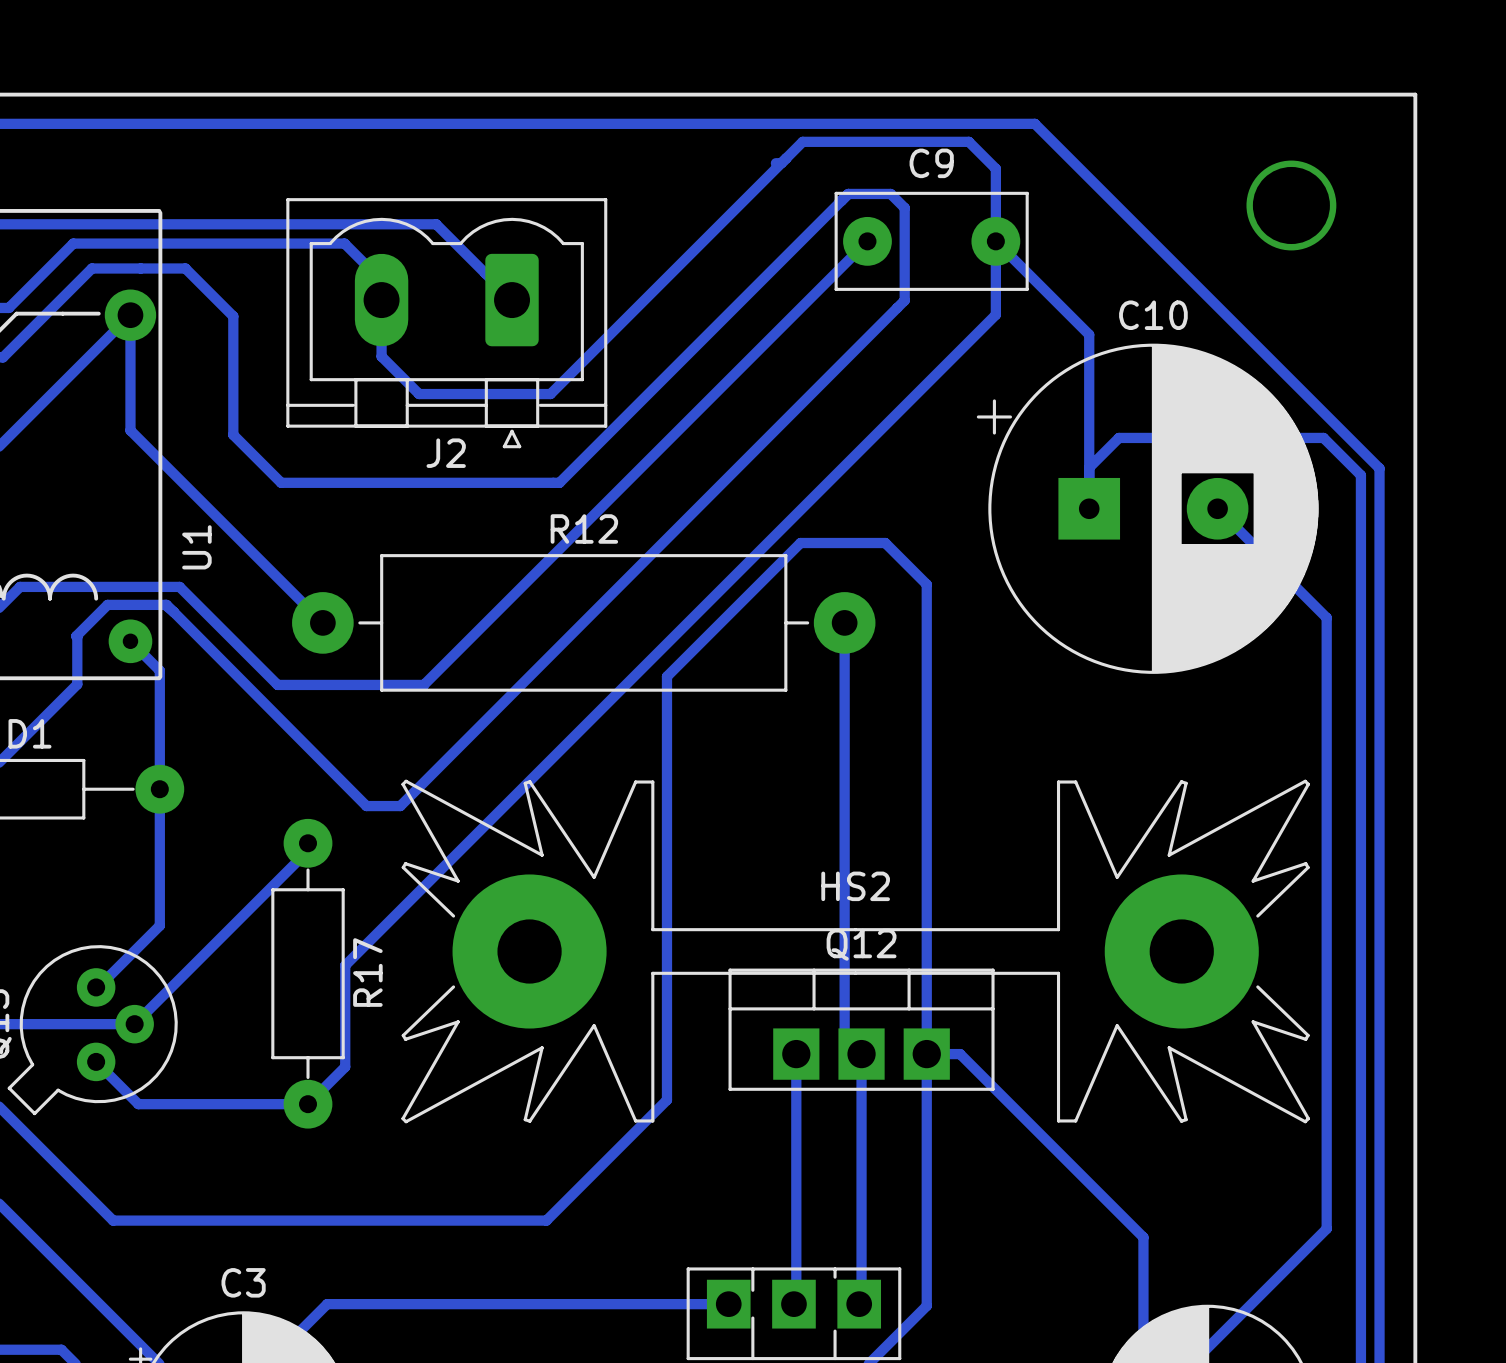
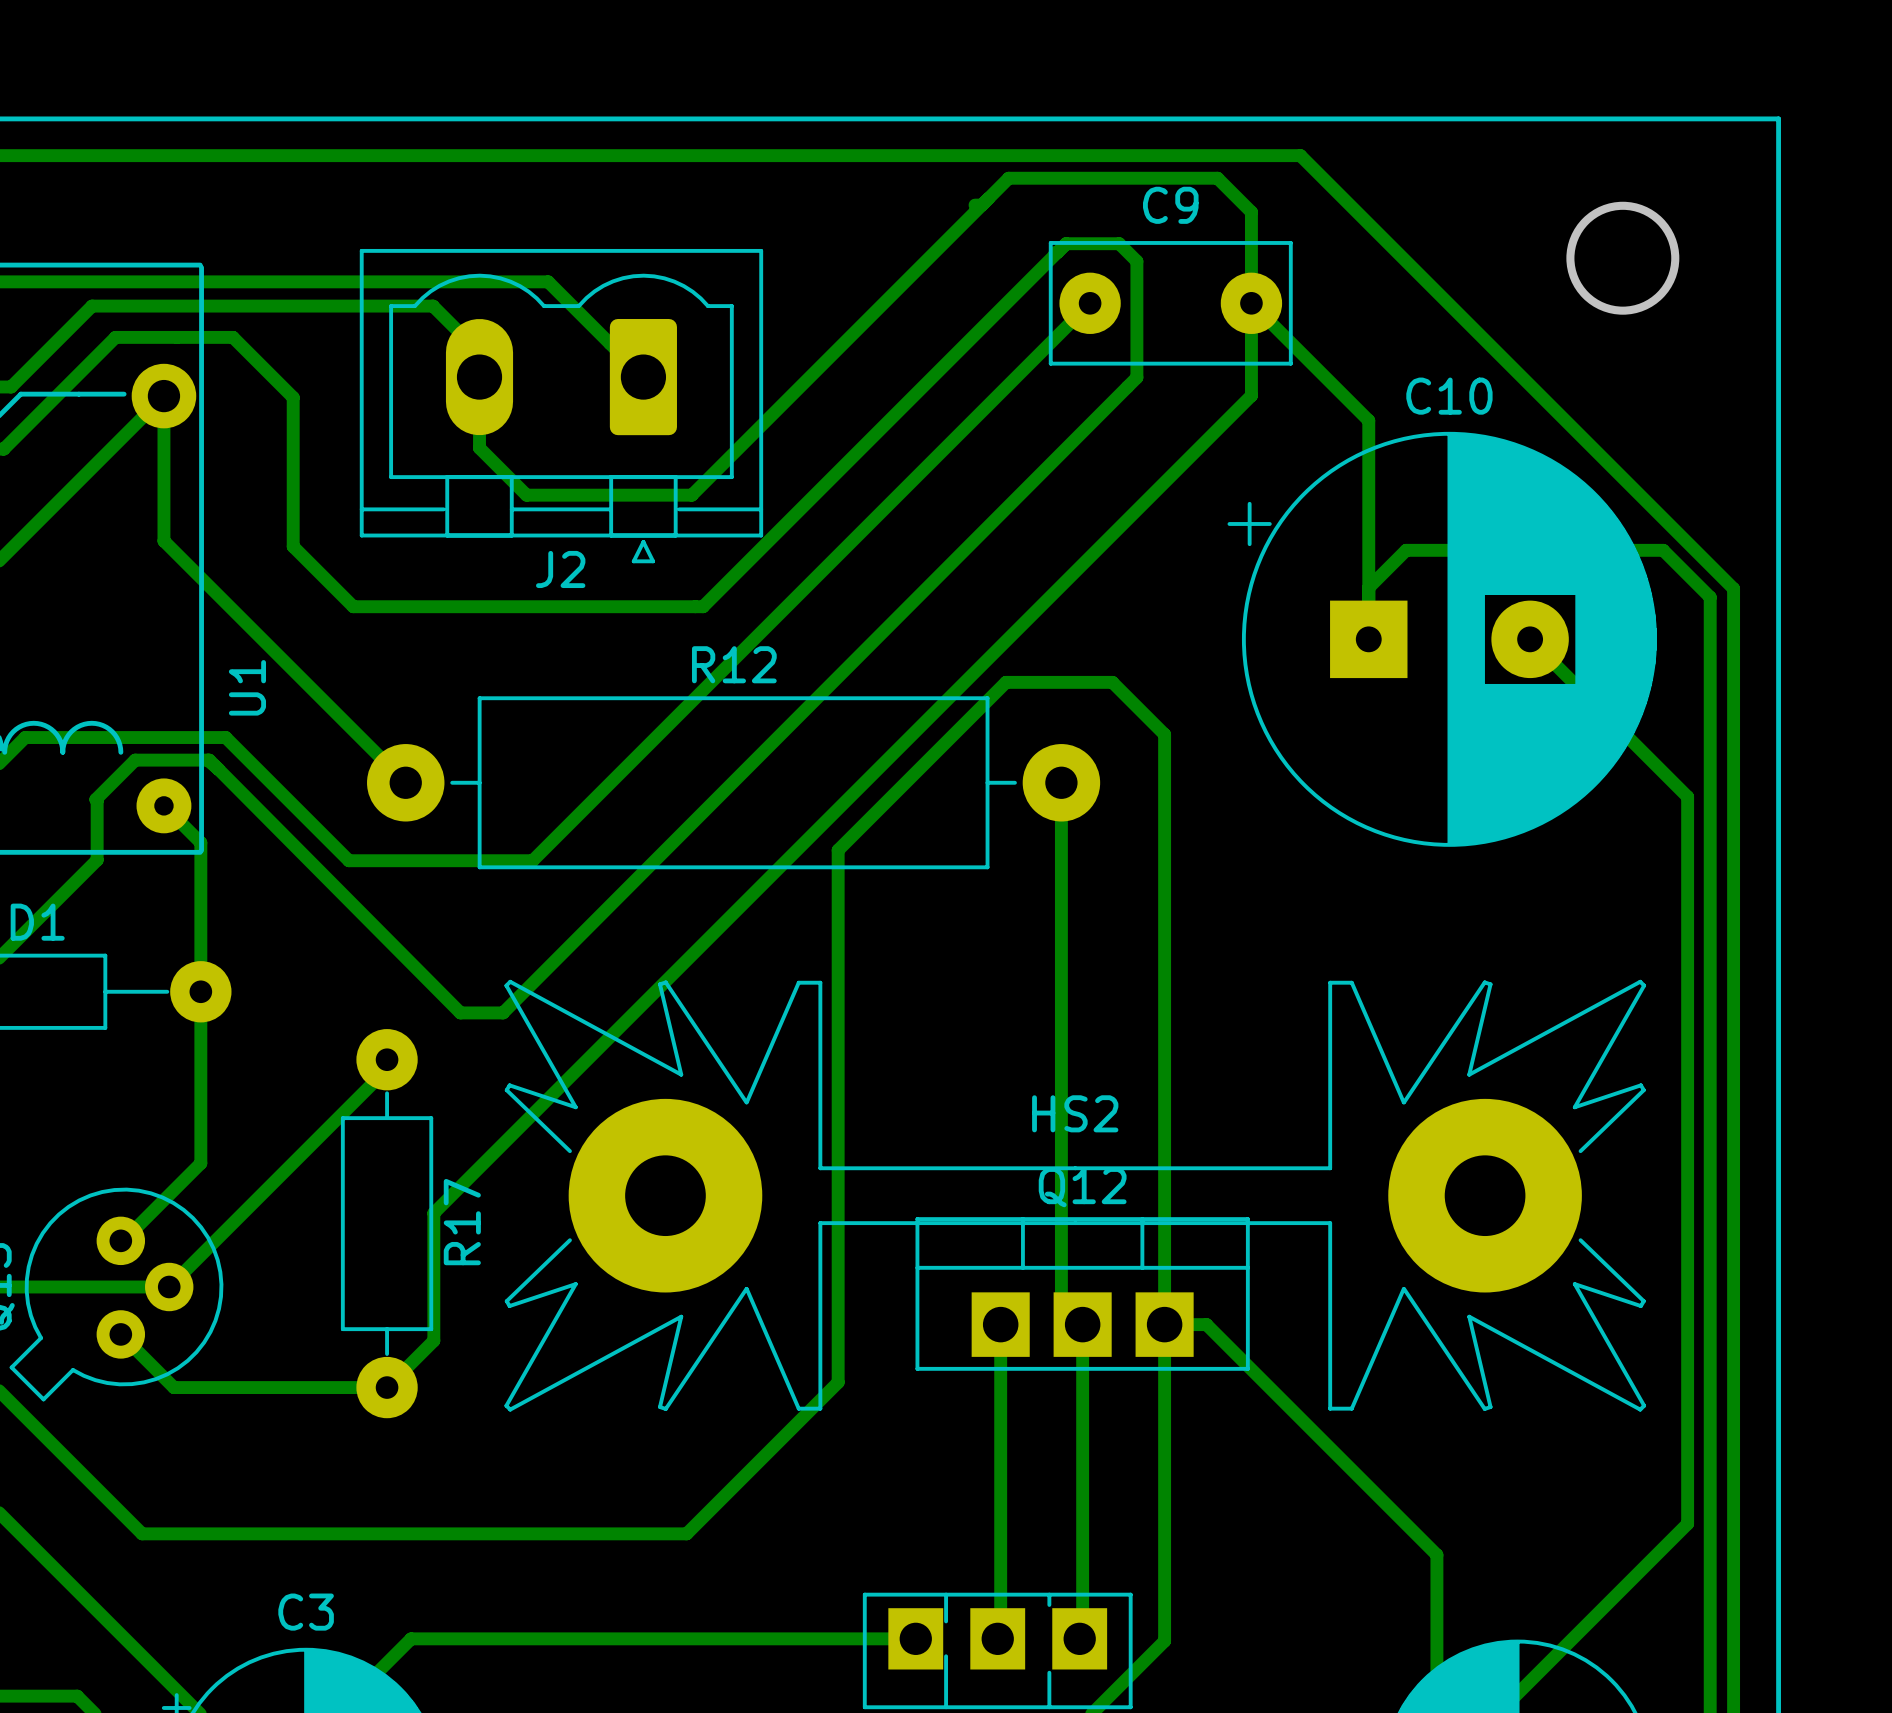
bottom track: (1326, 617) (1326, 1228) -> (1667, 776) (1687, 796) (1687, 1523) (1667, 1544)

